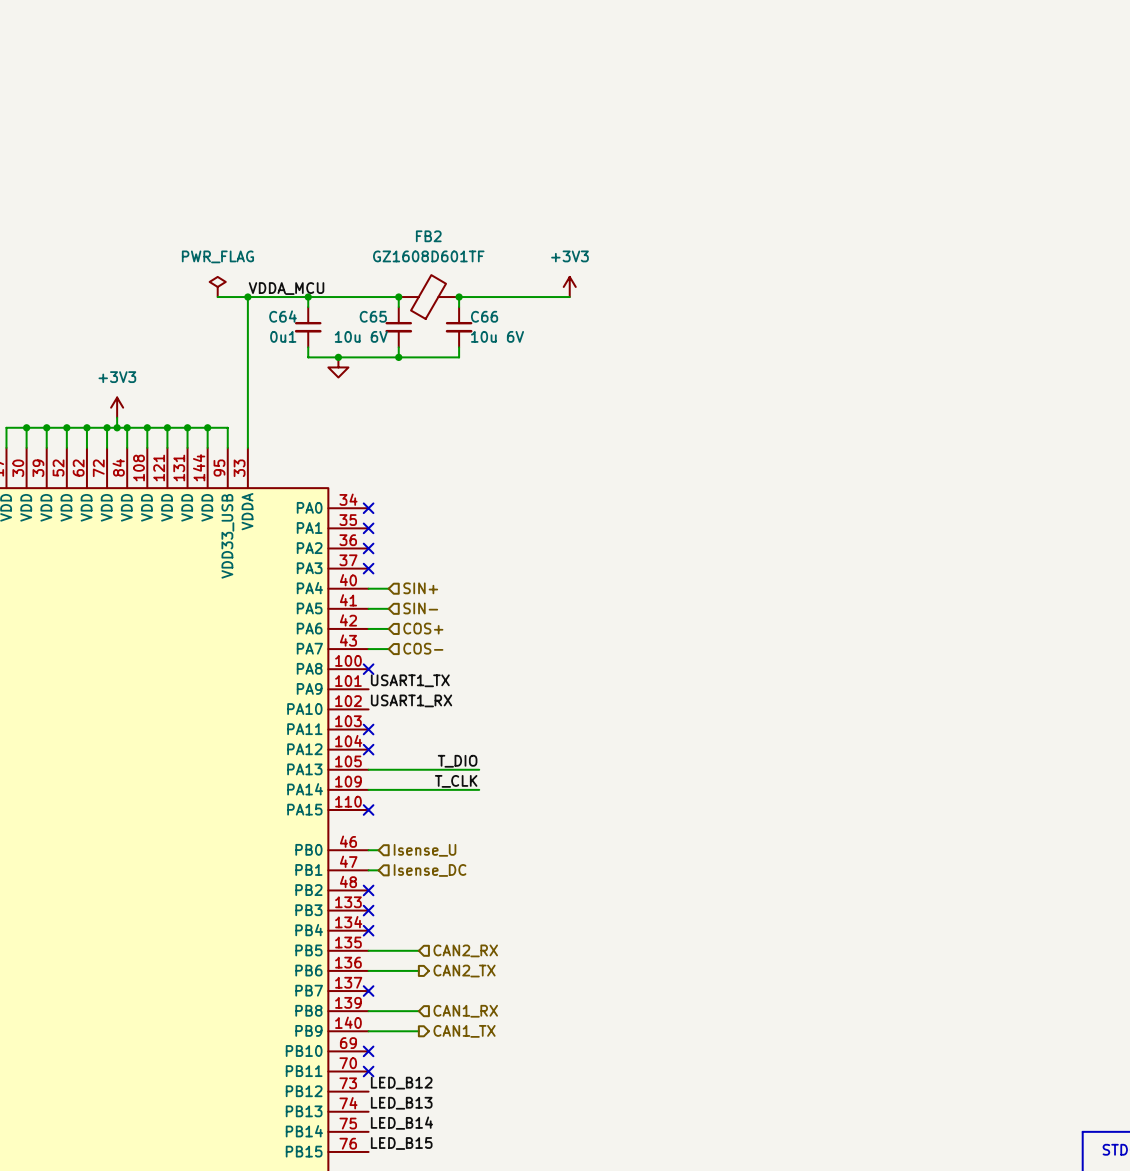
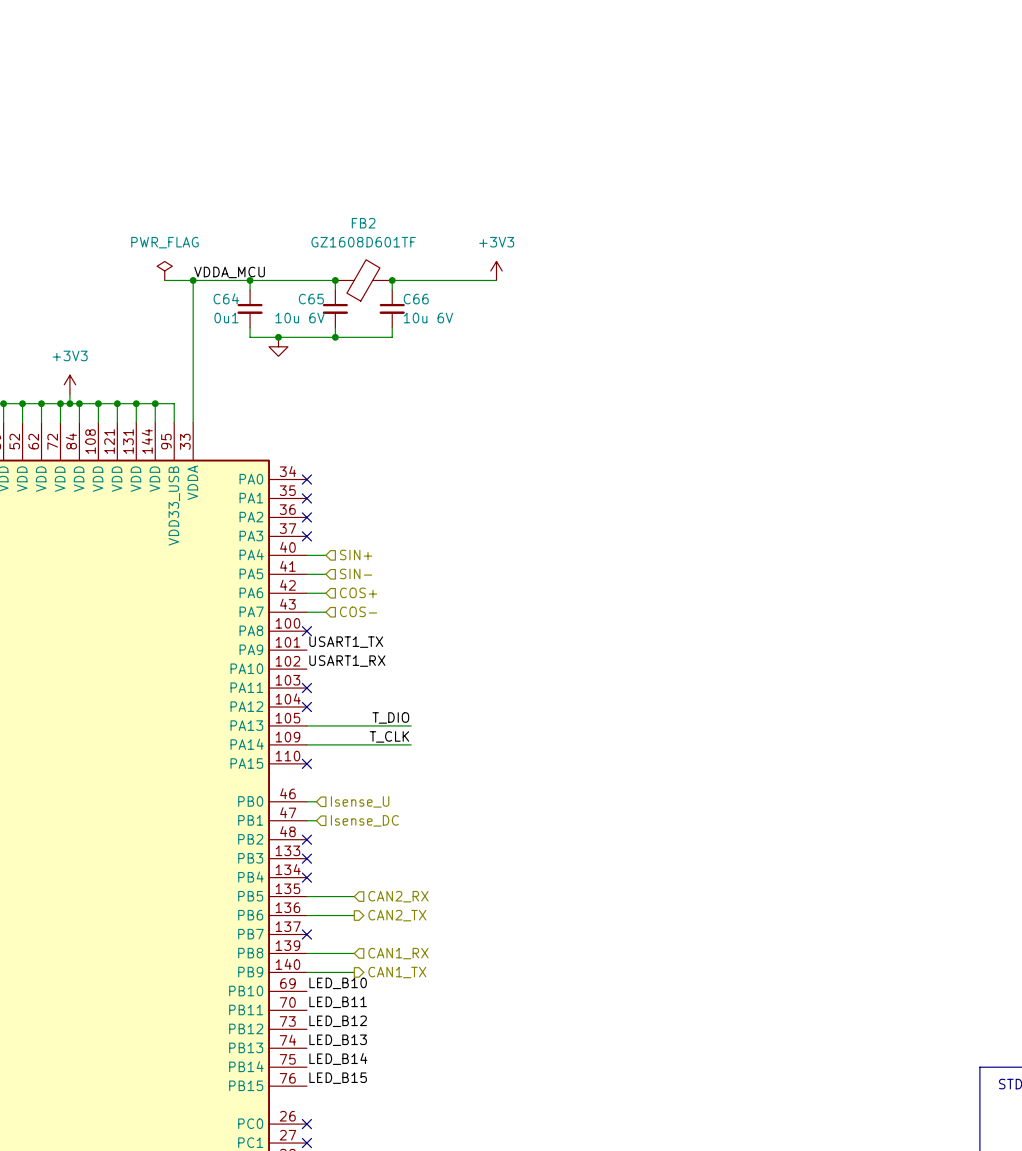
label: none -> LED_B10 (338, 983)
no-connect mark: (368, 1051) -> none
label: none -> LED_B11 (338, 1002)
no-connect mark: (368, 1071) -> none

